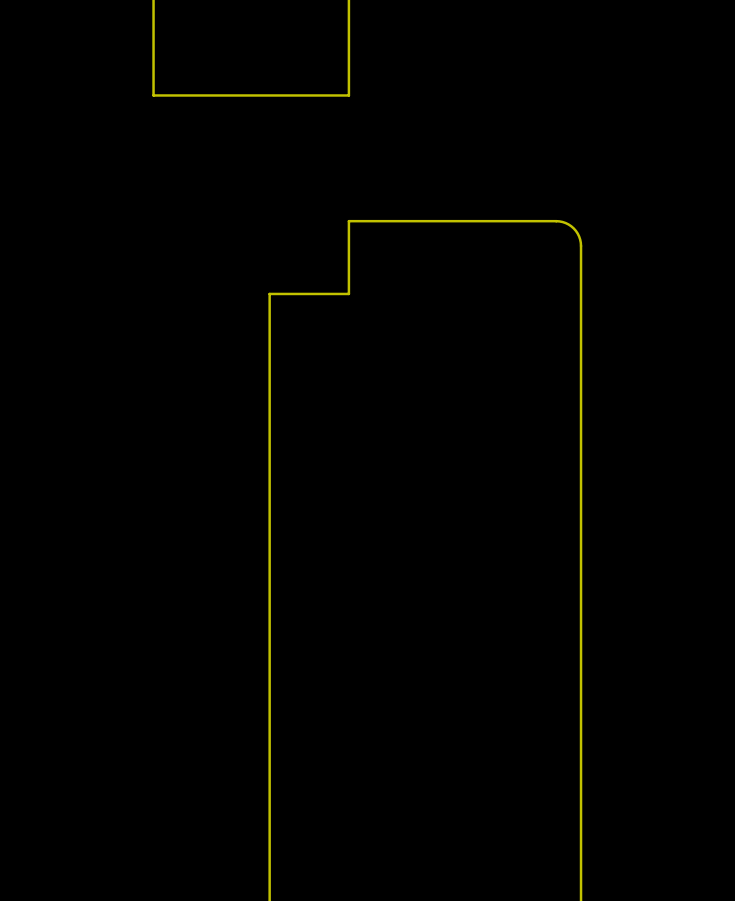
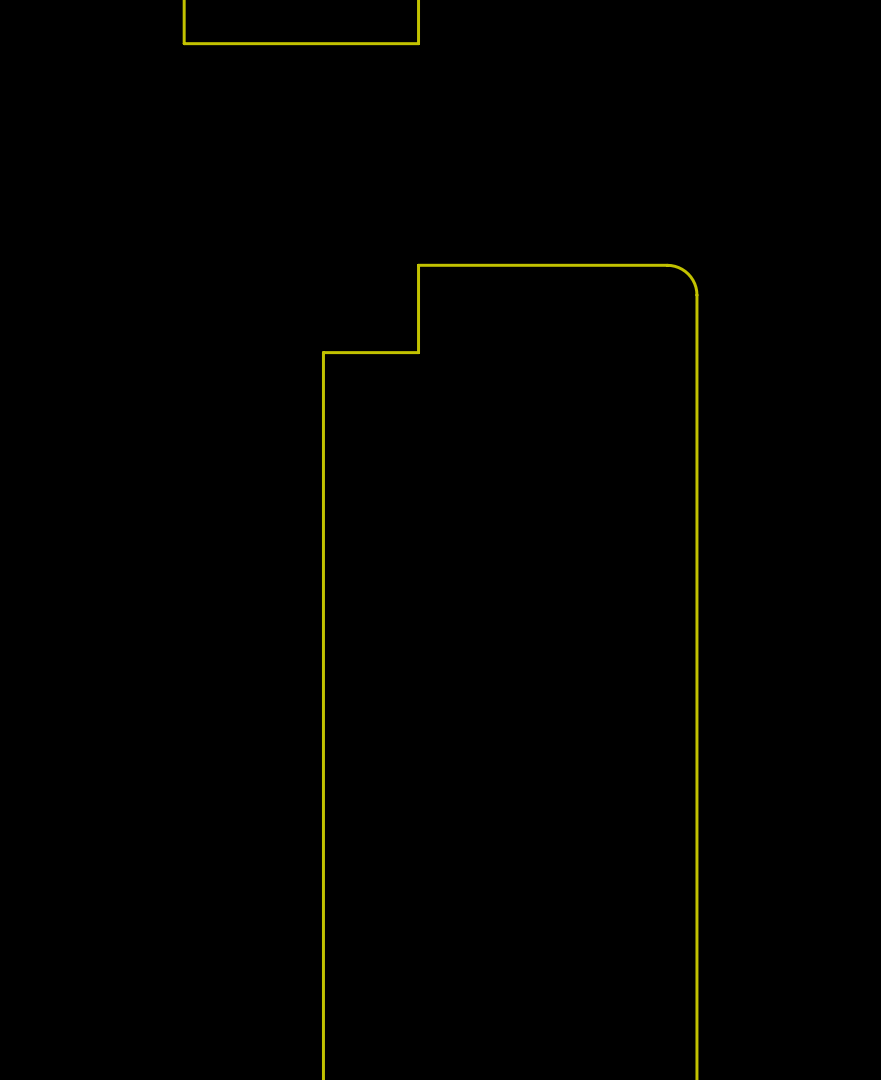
board edge: (348, 36) (348, 95) (153, 95) (153, 36) -> (418, 43) (184, 43)

